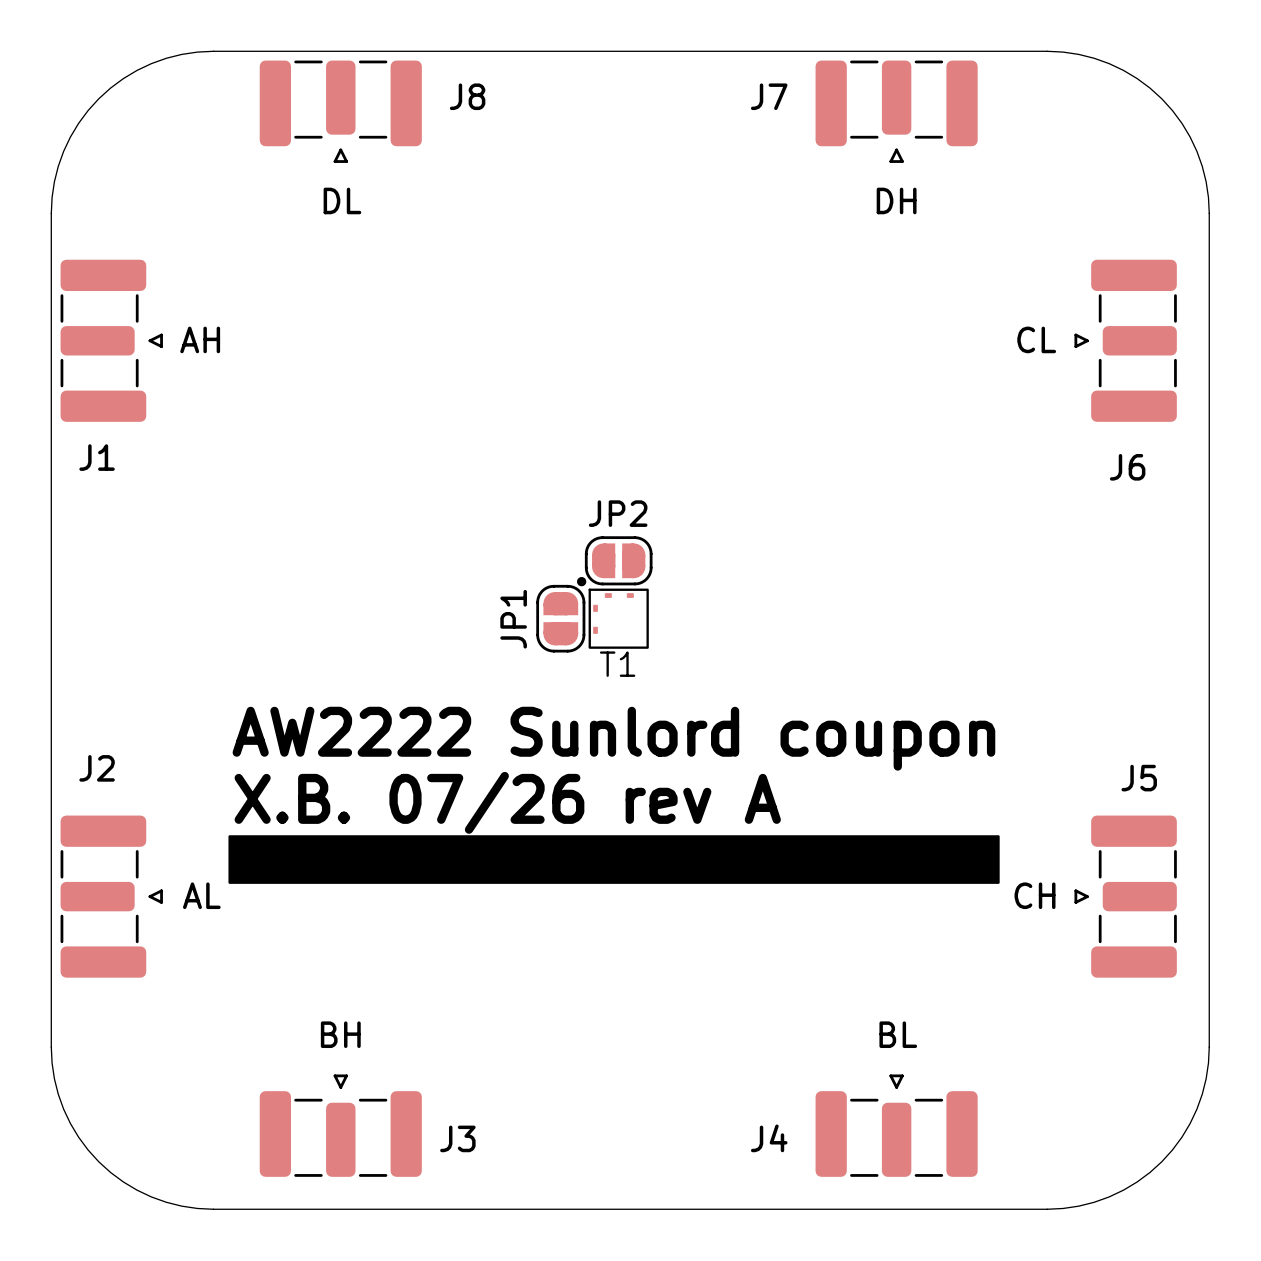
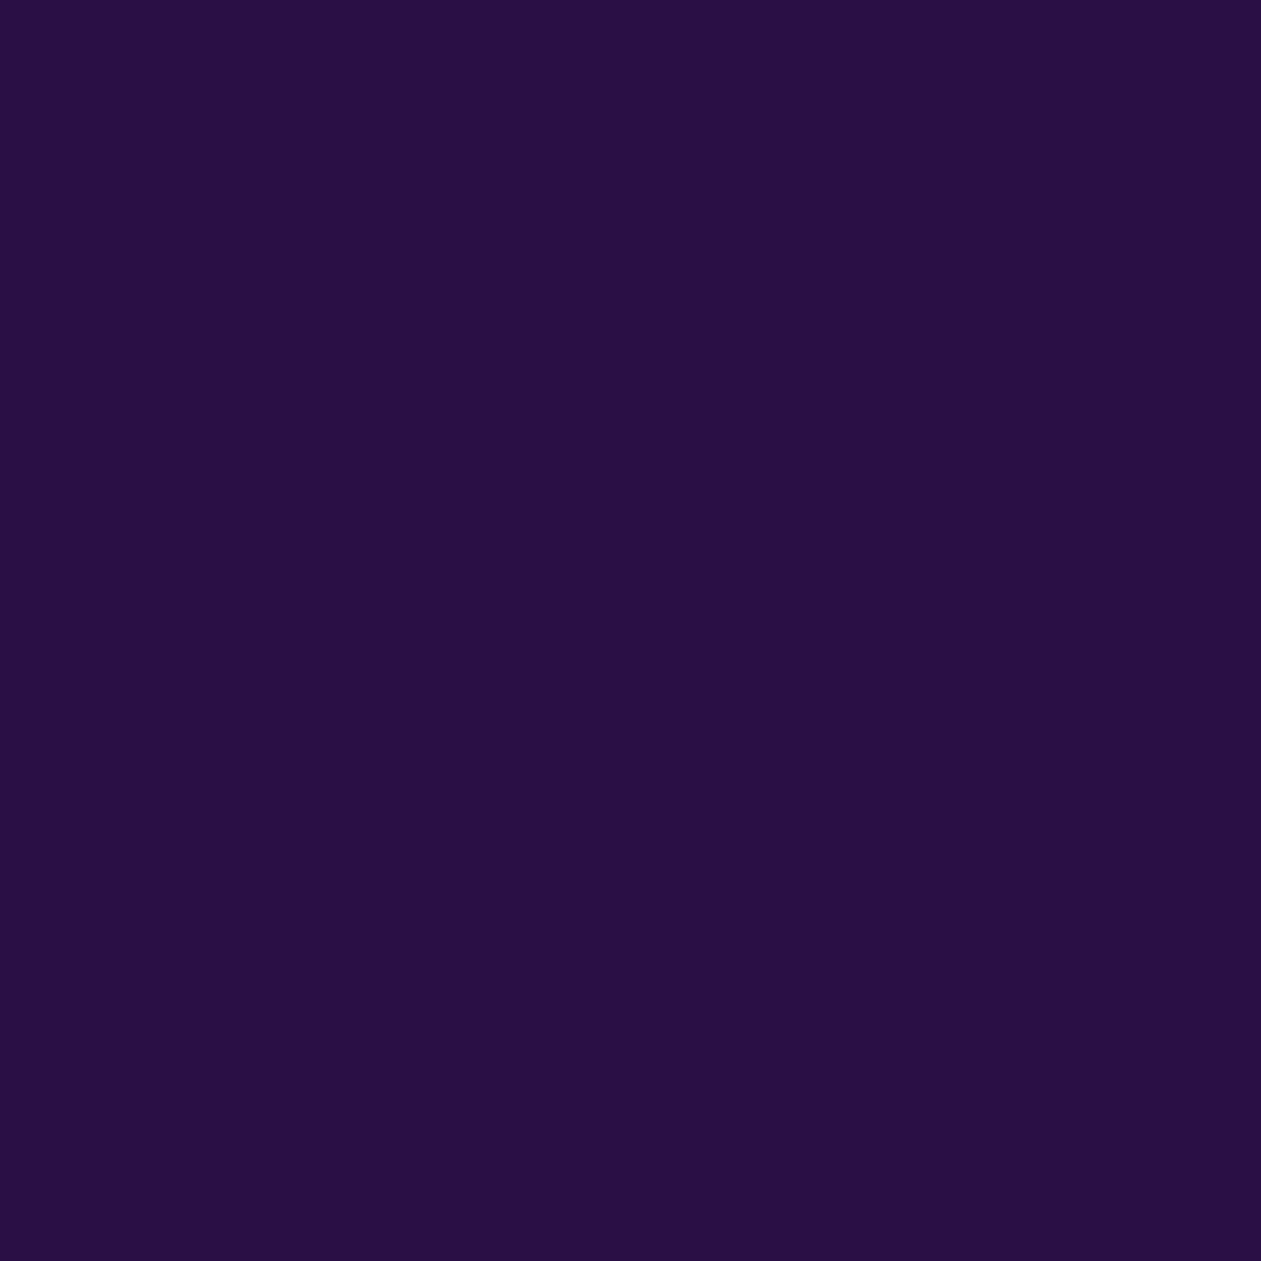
board edge: (213, 51) (1063, 52) (1094, 58) (1123, 70) (1149, 88) (1172, 110) (1190, 136) (1202, 166) (1208, 197) (1209, 213) (1209, 1047) (1206, 1078) (1196, 1109) (1190, 1123) (1172, 1149) (1149, 1172) (1137, 1181) (1109, 1196) (1078, 1206) (1047, 1209) (213, 1209) (181, 1206) (151, 1196) (123, 1181) (110, 1172) (88, 1149) (78, 1137) (63, 1109) (54, 1078) (51, 1047) (52, 197) (54, 181) (63, 151) (78, 123) (98, 98) (123, 78) (151, 63) (181, 54) (213, 51) -> none
J8: DL (340, 111) -> none
J7: DH (896, 111) -> none
J1: AH (111, 340) -> none
J6: CL (1125, 340) -> none
JP2: (618, 560) -> none
T1: (612, 612) -> none
JP1: (560, 618) -> none
text: AW2222 Sunlord coupon (613, 738) -> none
text: X.B. 07/26 rev A (507, 802) -> none
drawing: [228, 835, 1000, 884] -> none
J2: AL (111, 896) -> none
J5: CH (1125, 896) -> none
J3: BH (340, 1125) -> none
J4: BL (896, 1125) -> none

